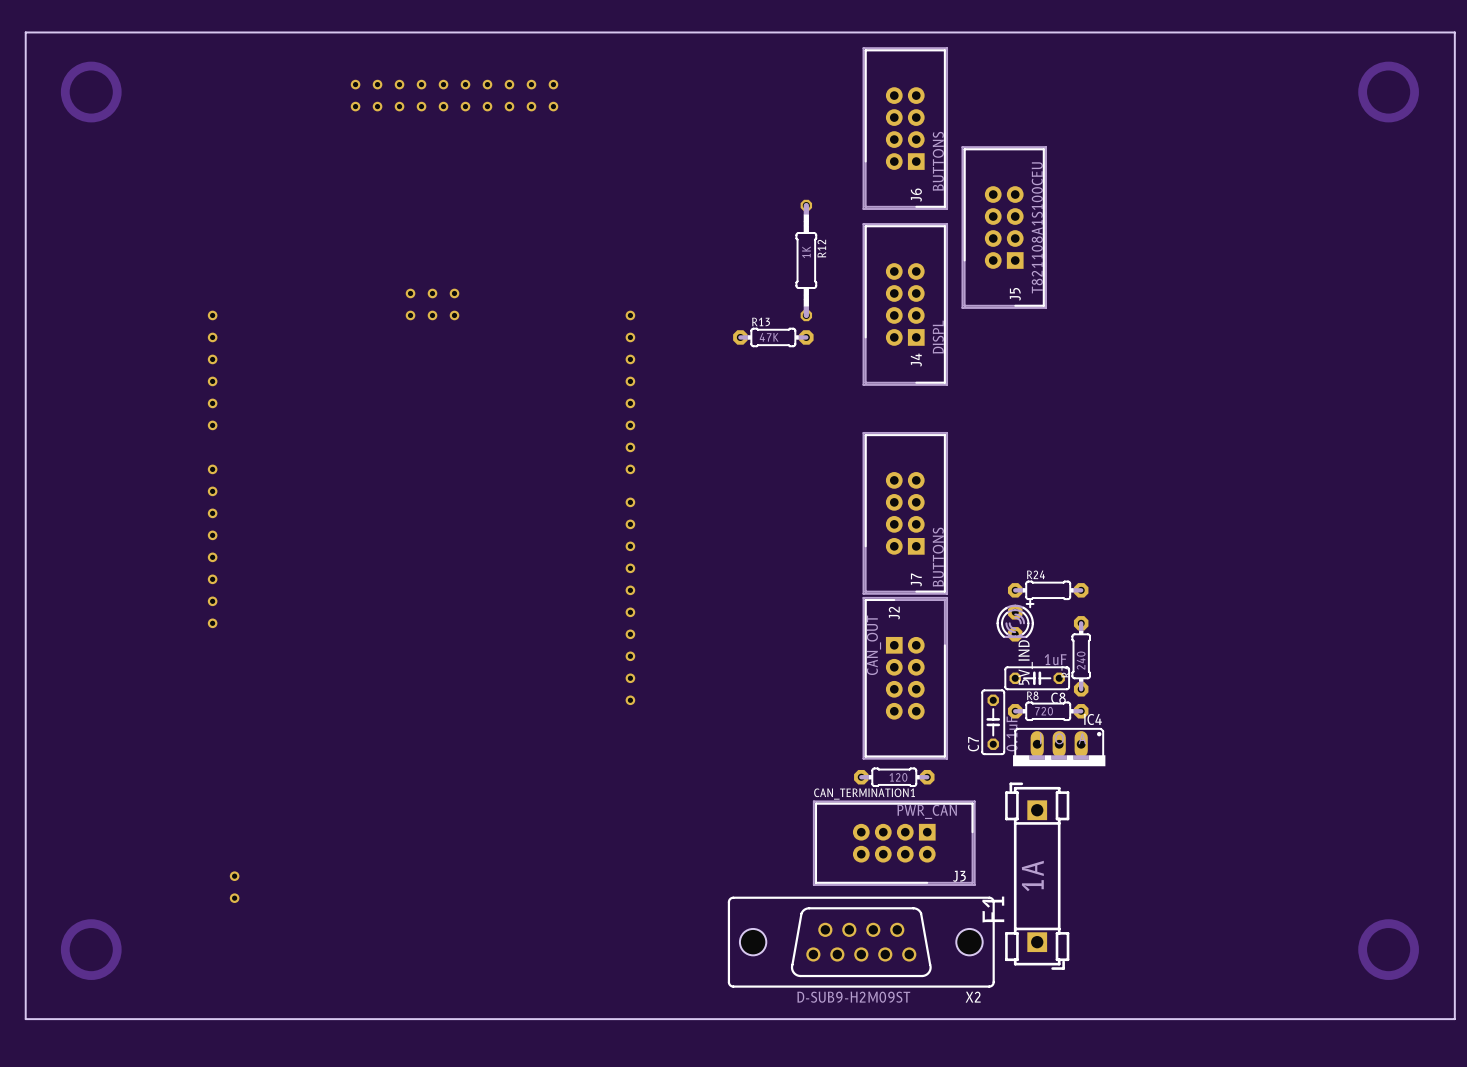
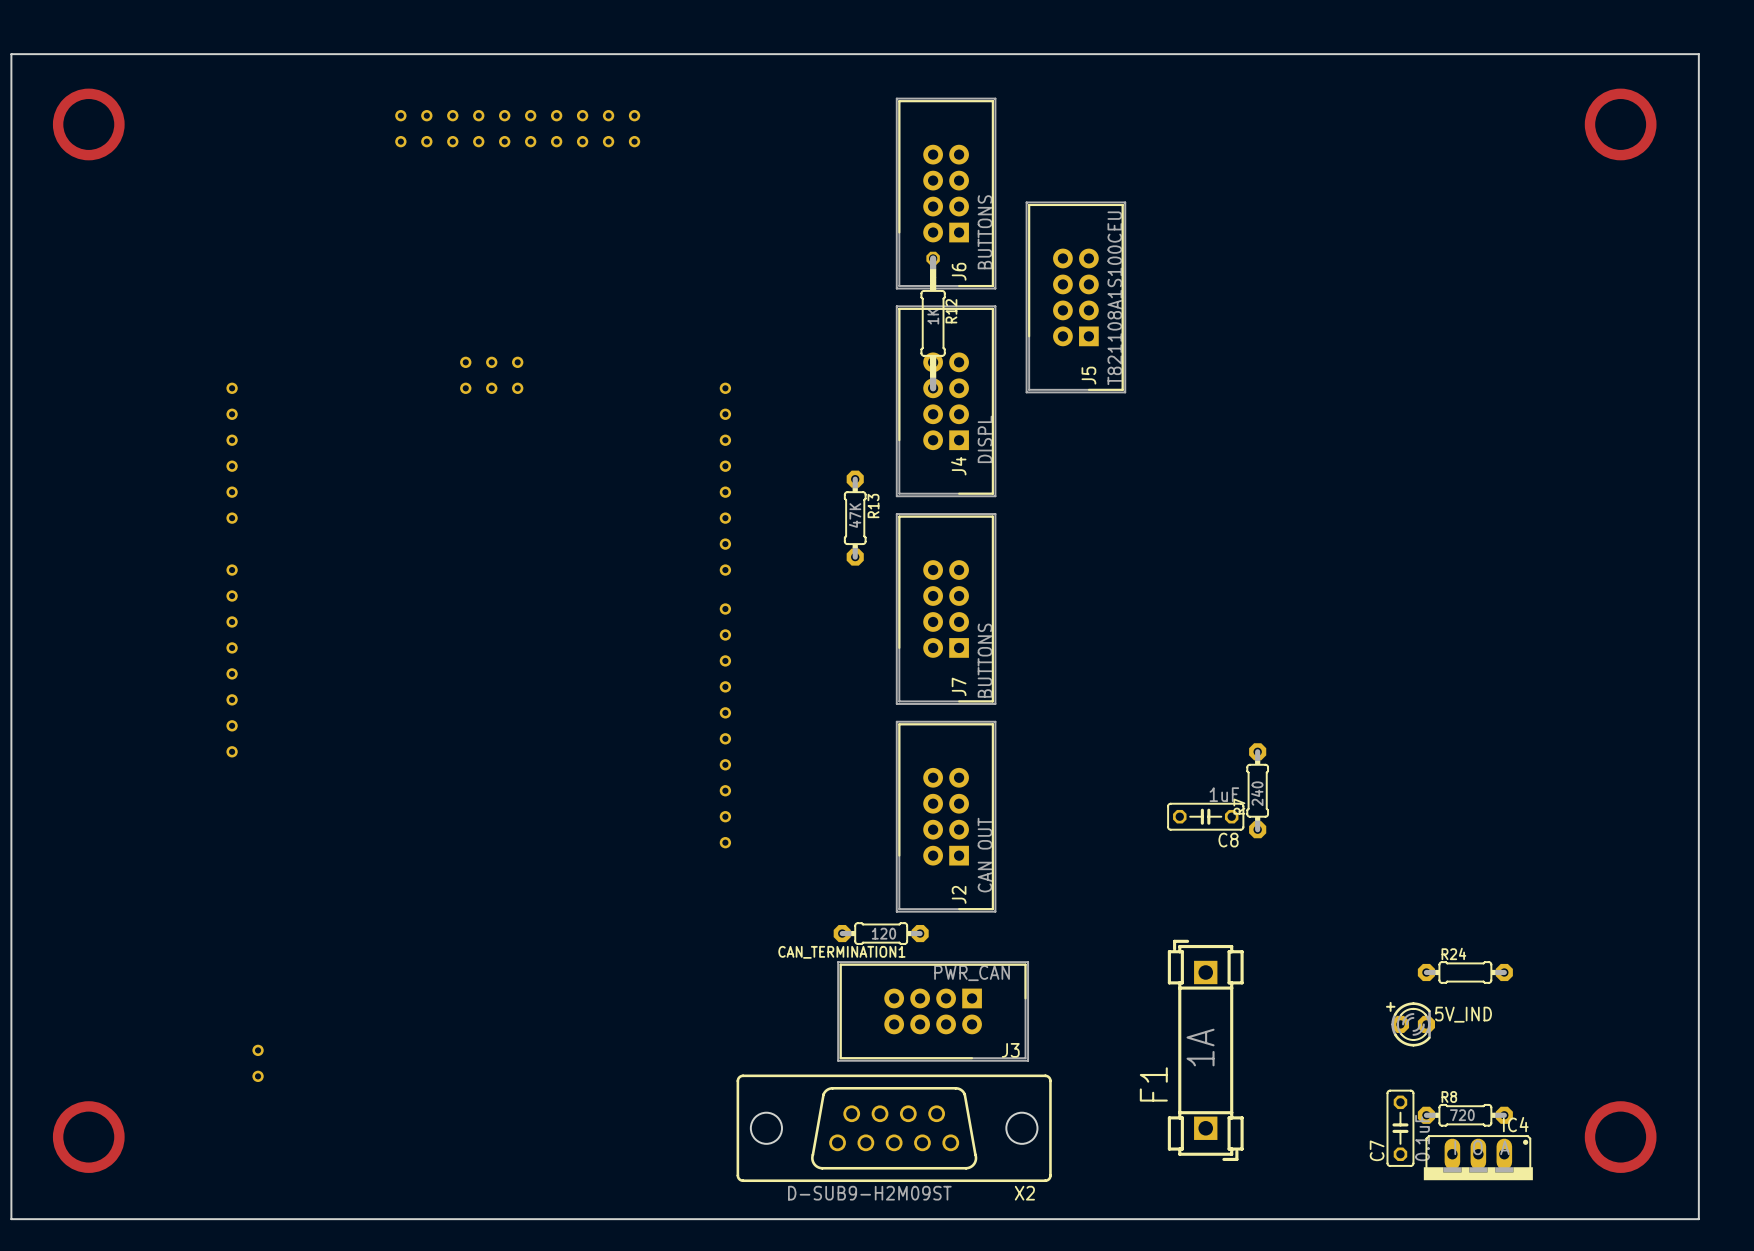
J6 position: (905, 128) -> (946, 193)
J5 position: (1004, 227) -> (1075, 297)
J4 position: (905, 304) -> (946, 401)
R13 rotation: 0° (773, 337) -> 90° clockwise (855, 518)
R13 position: (773, 337) -> (855, 518)
J7 position: (905, 513) -> (946, 609)
R24 position: (1048, 590) -> (1465, 972)
5V_IND rotation: 0° (1015, 620) -> 90° counterclockwise (1410, 1024)
5V_IND position: (1015, 620) -> (1410, 1024)
J2 rotation: 0° (905, 678) -> 180° (946, 816)
R8 position: (1048, 711) -> (1465, 1115)
C7 position: (993, 722) -> (1400, 1128)
IC4 position: (1059, 747) -> (1478, 1157)
CAN_TERMINATION1 position: (894, 777) -> (881, 933)
J3 position: (894, 843) -> (933, 1011)
X2 position: (861, 942) -> (894, 1128)

